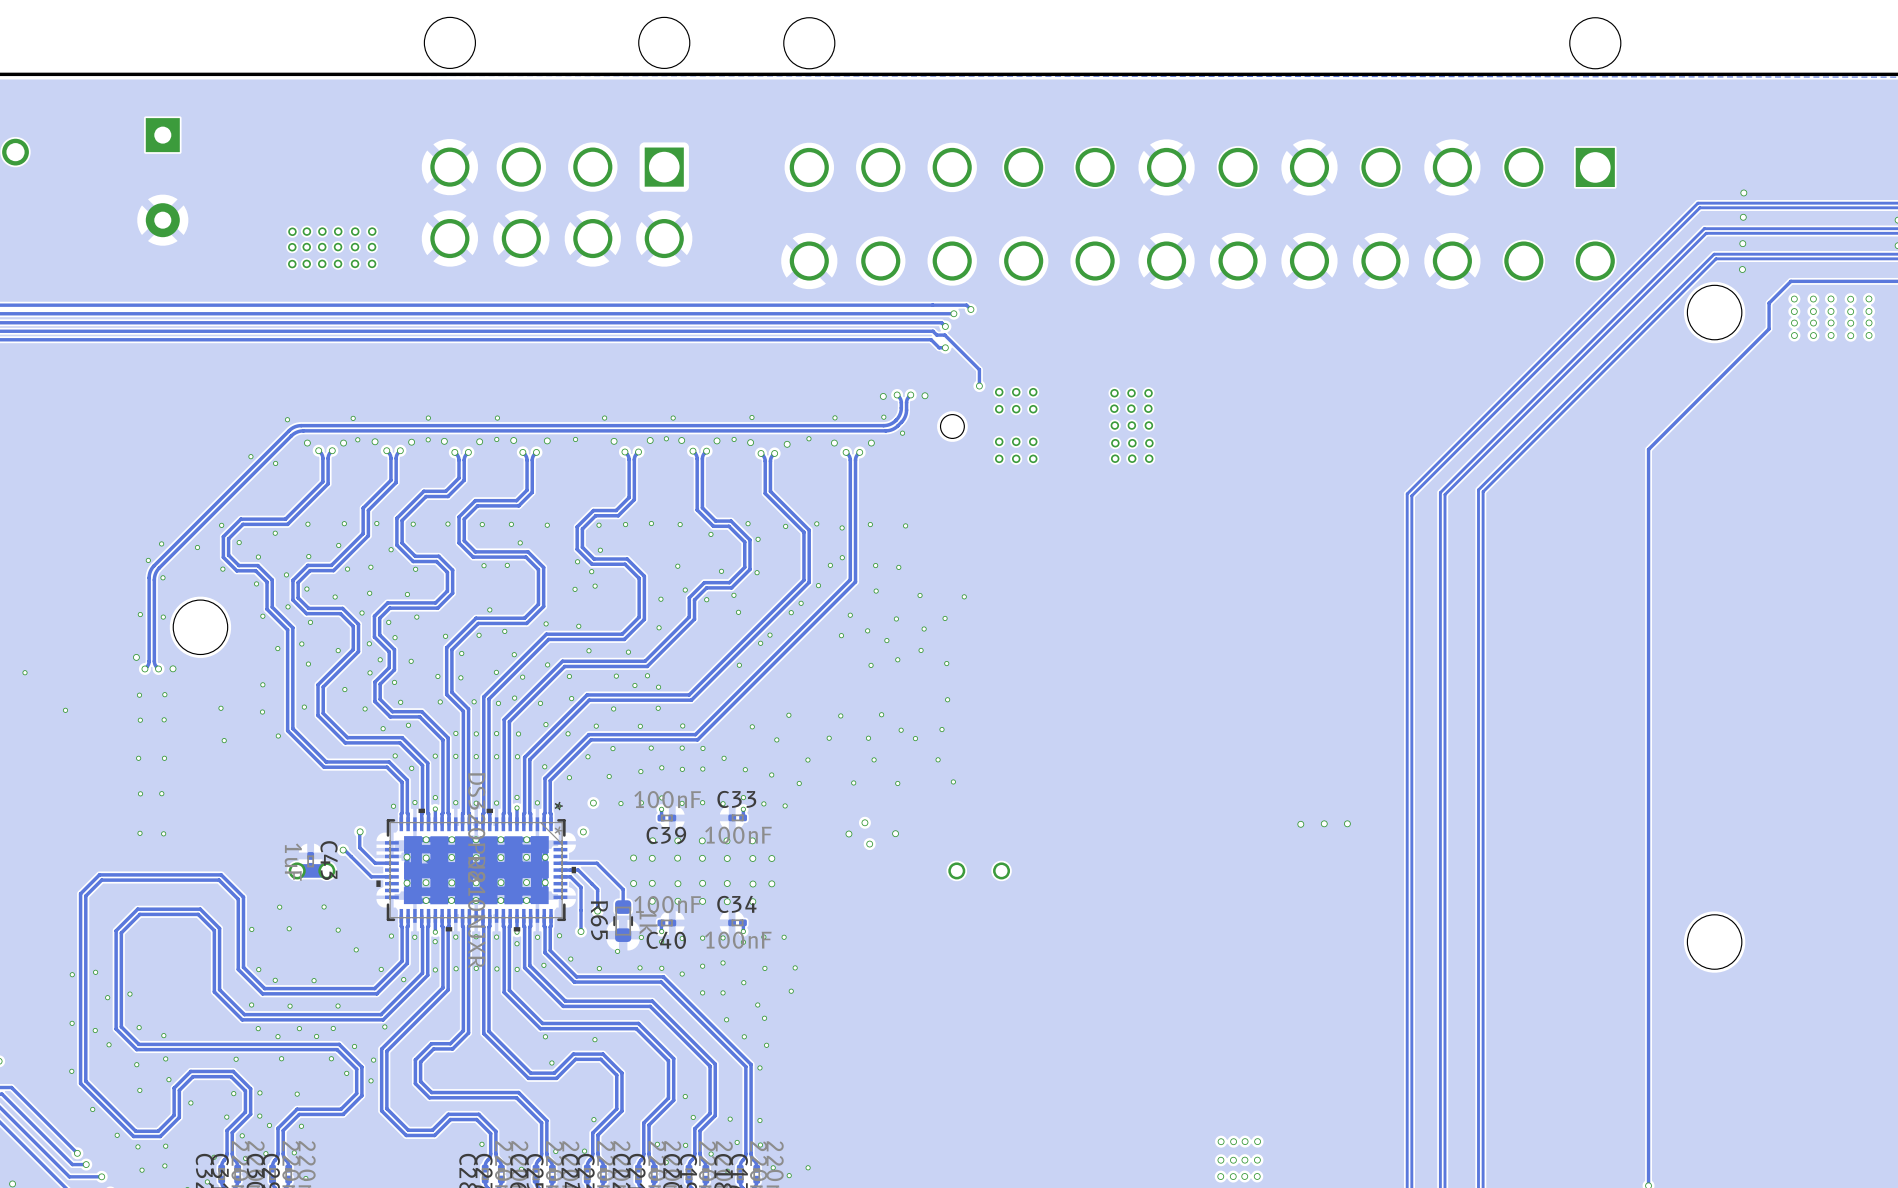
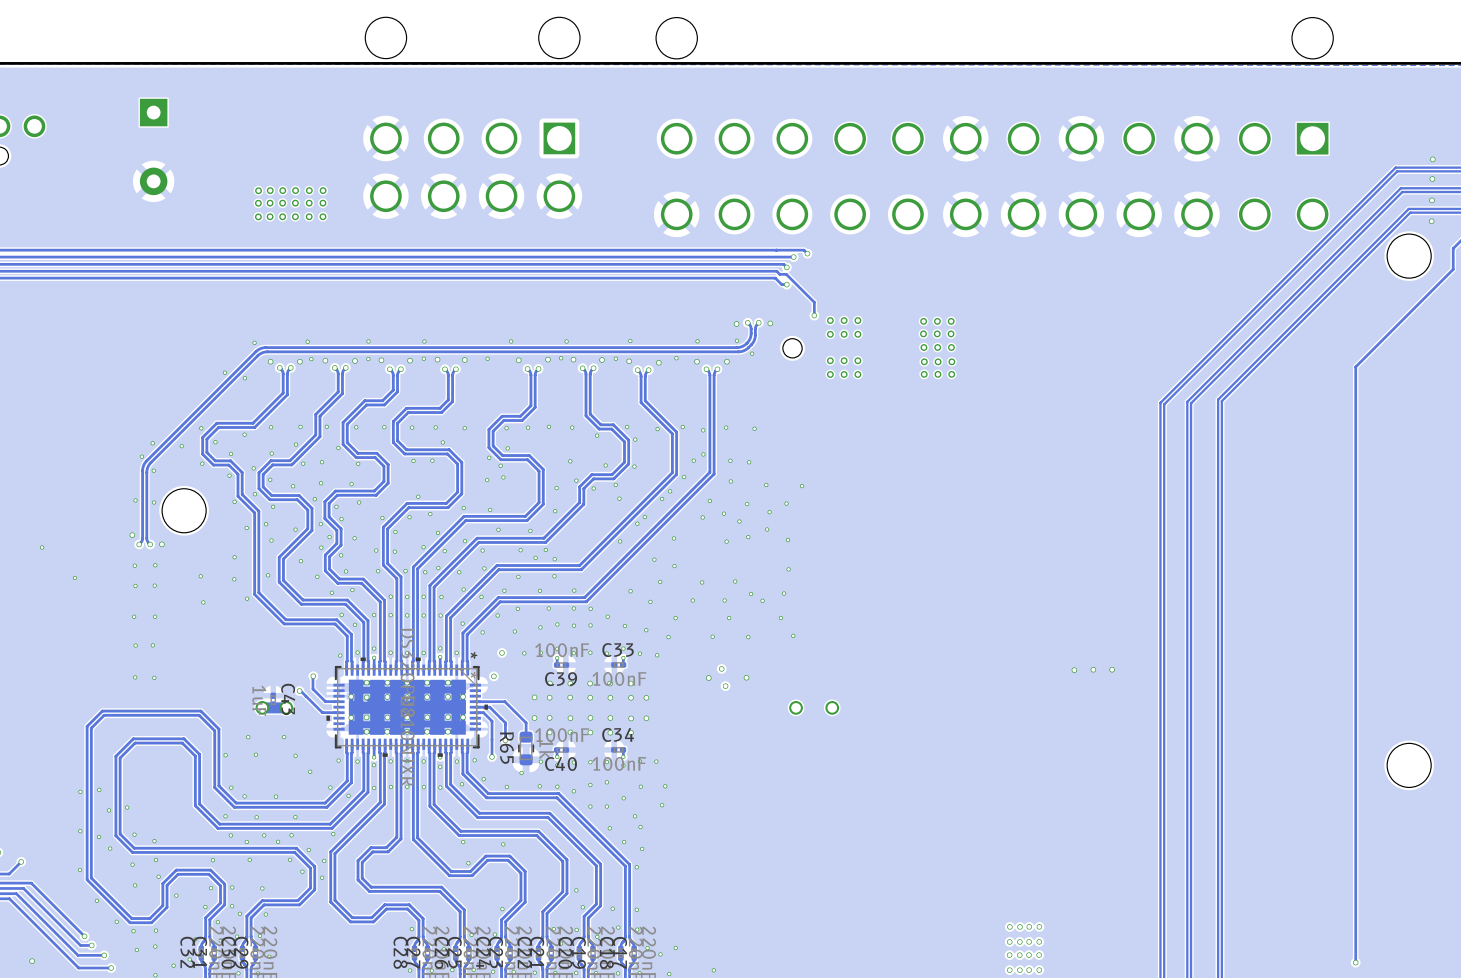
via: none -> (673, 538)
via: none -> (654, 559)
via: none -> (674, 566)

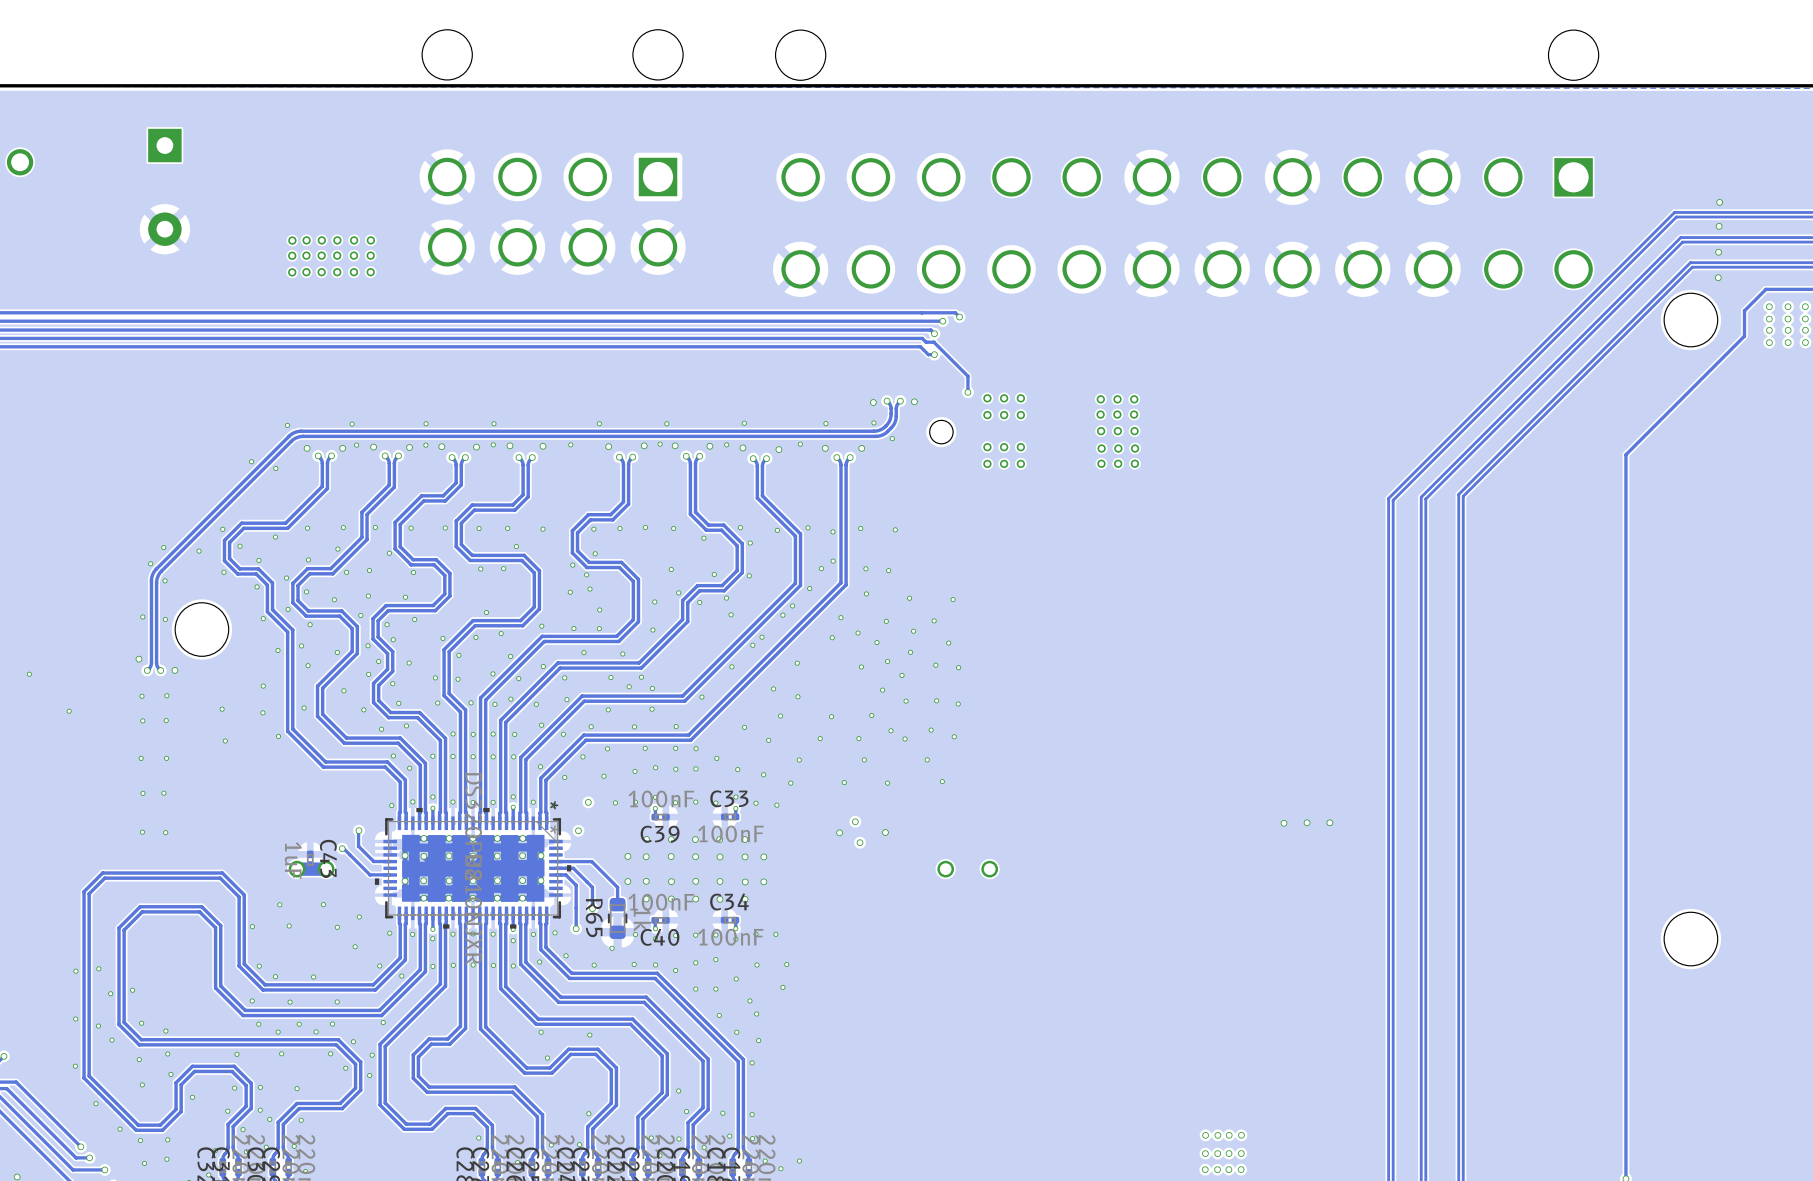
via: none -> (599, 609)
via: none -> (599, 628)
via: none -> (948, 643)
via: none -> (958, 667)
via: none -> (902, 675)
via: none -> (882, 690)
via: none -> (701, 697)
via: none -> (906, 701)
via: none -> (958, 704)
via: none -> (954, 736)
via: none -> (359, 916)

